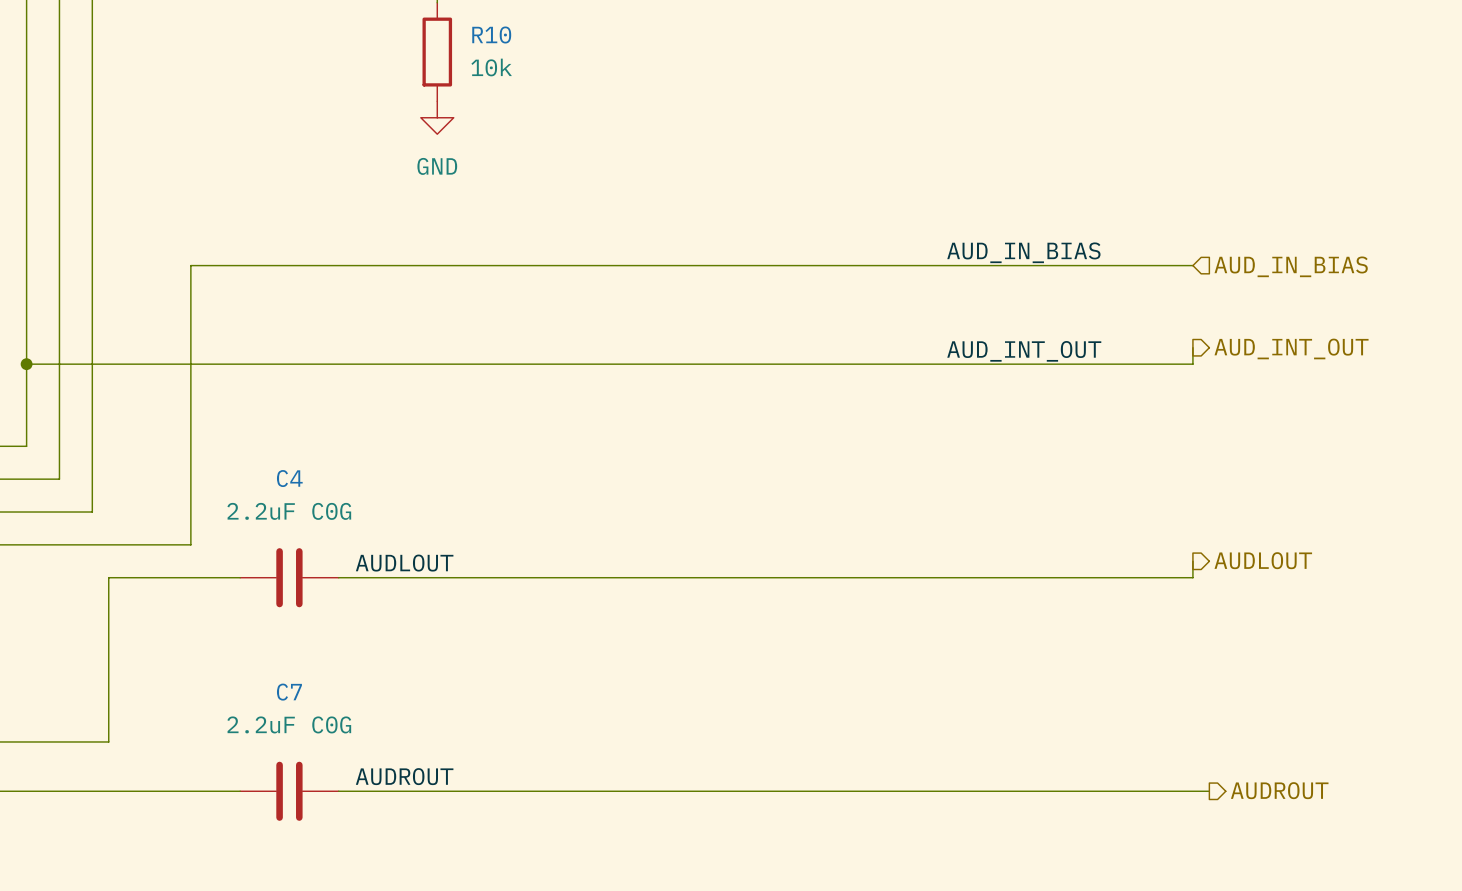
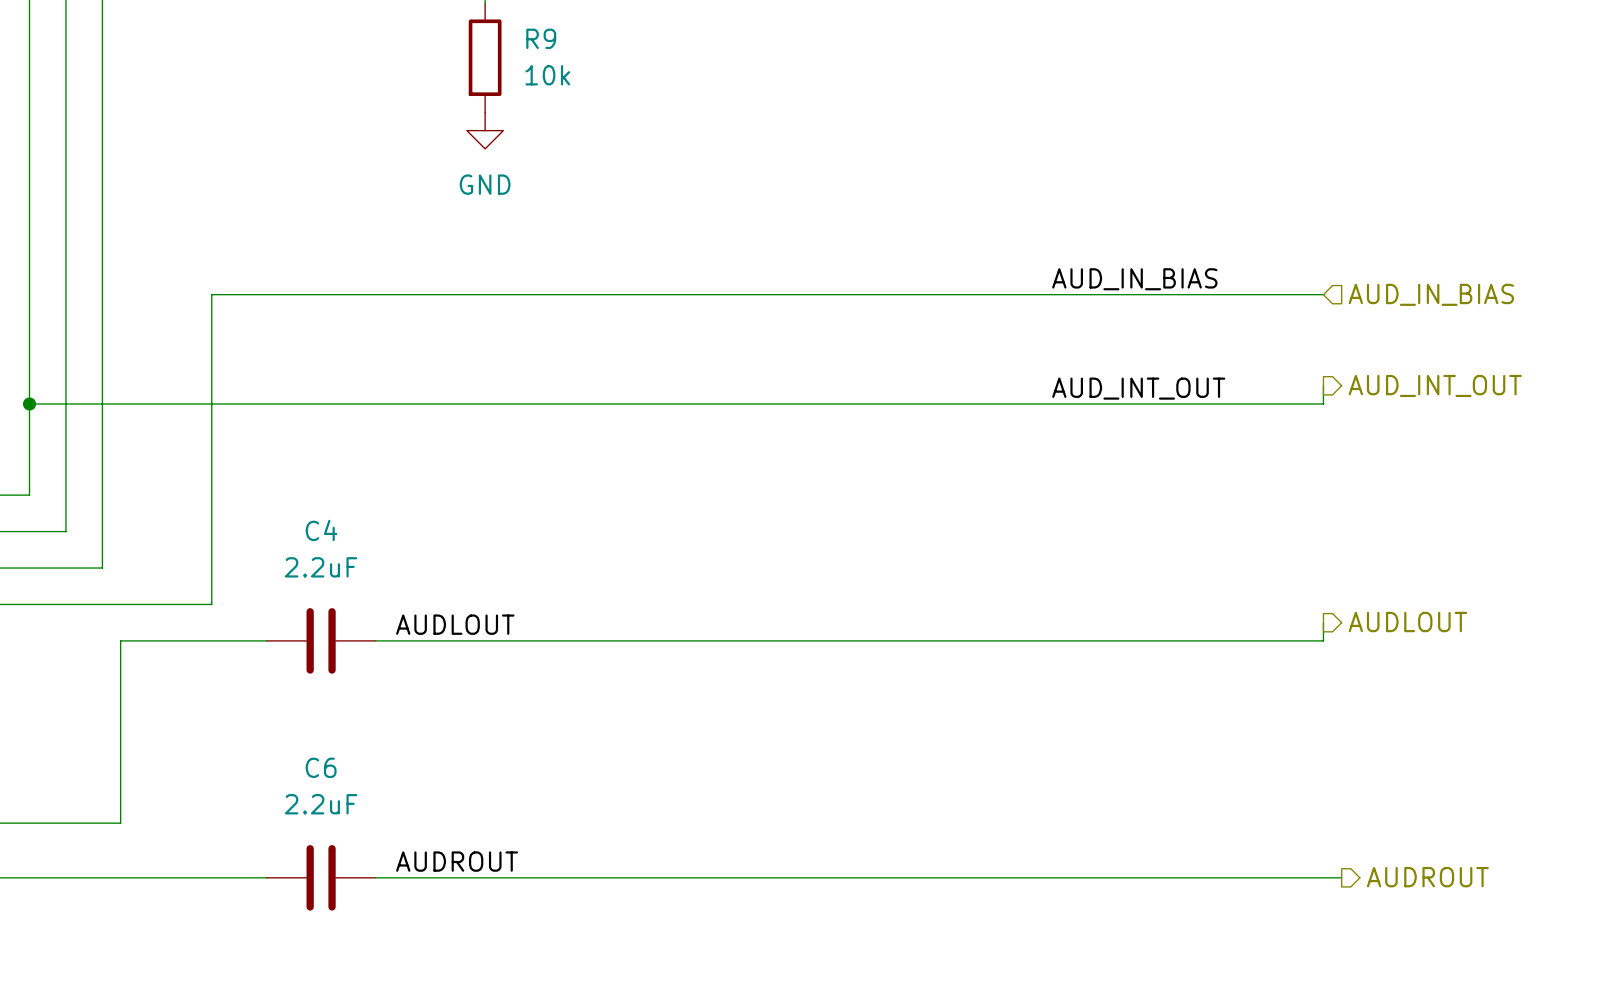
R10 name: R10 (491, 35) -> R9 (541, 38)
C4 value: 2.2uF C0G (289, 511) -> 2.2uF (321, 567)
C7 name: C7 (289, 692) -> C6 (321, 767)
C7 value: 2.2uF C0G (289, 724) -> 2.2uF (321, 804)

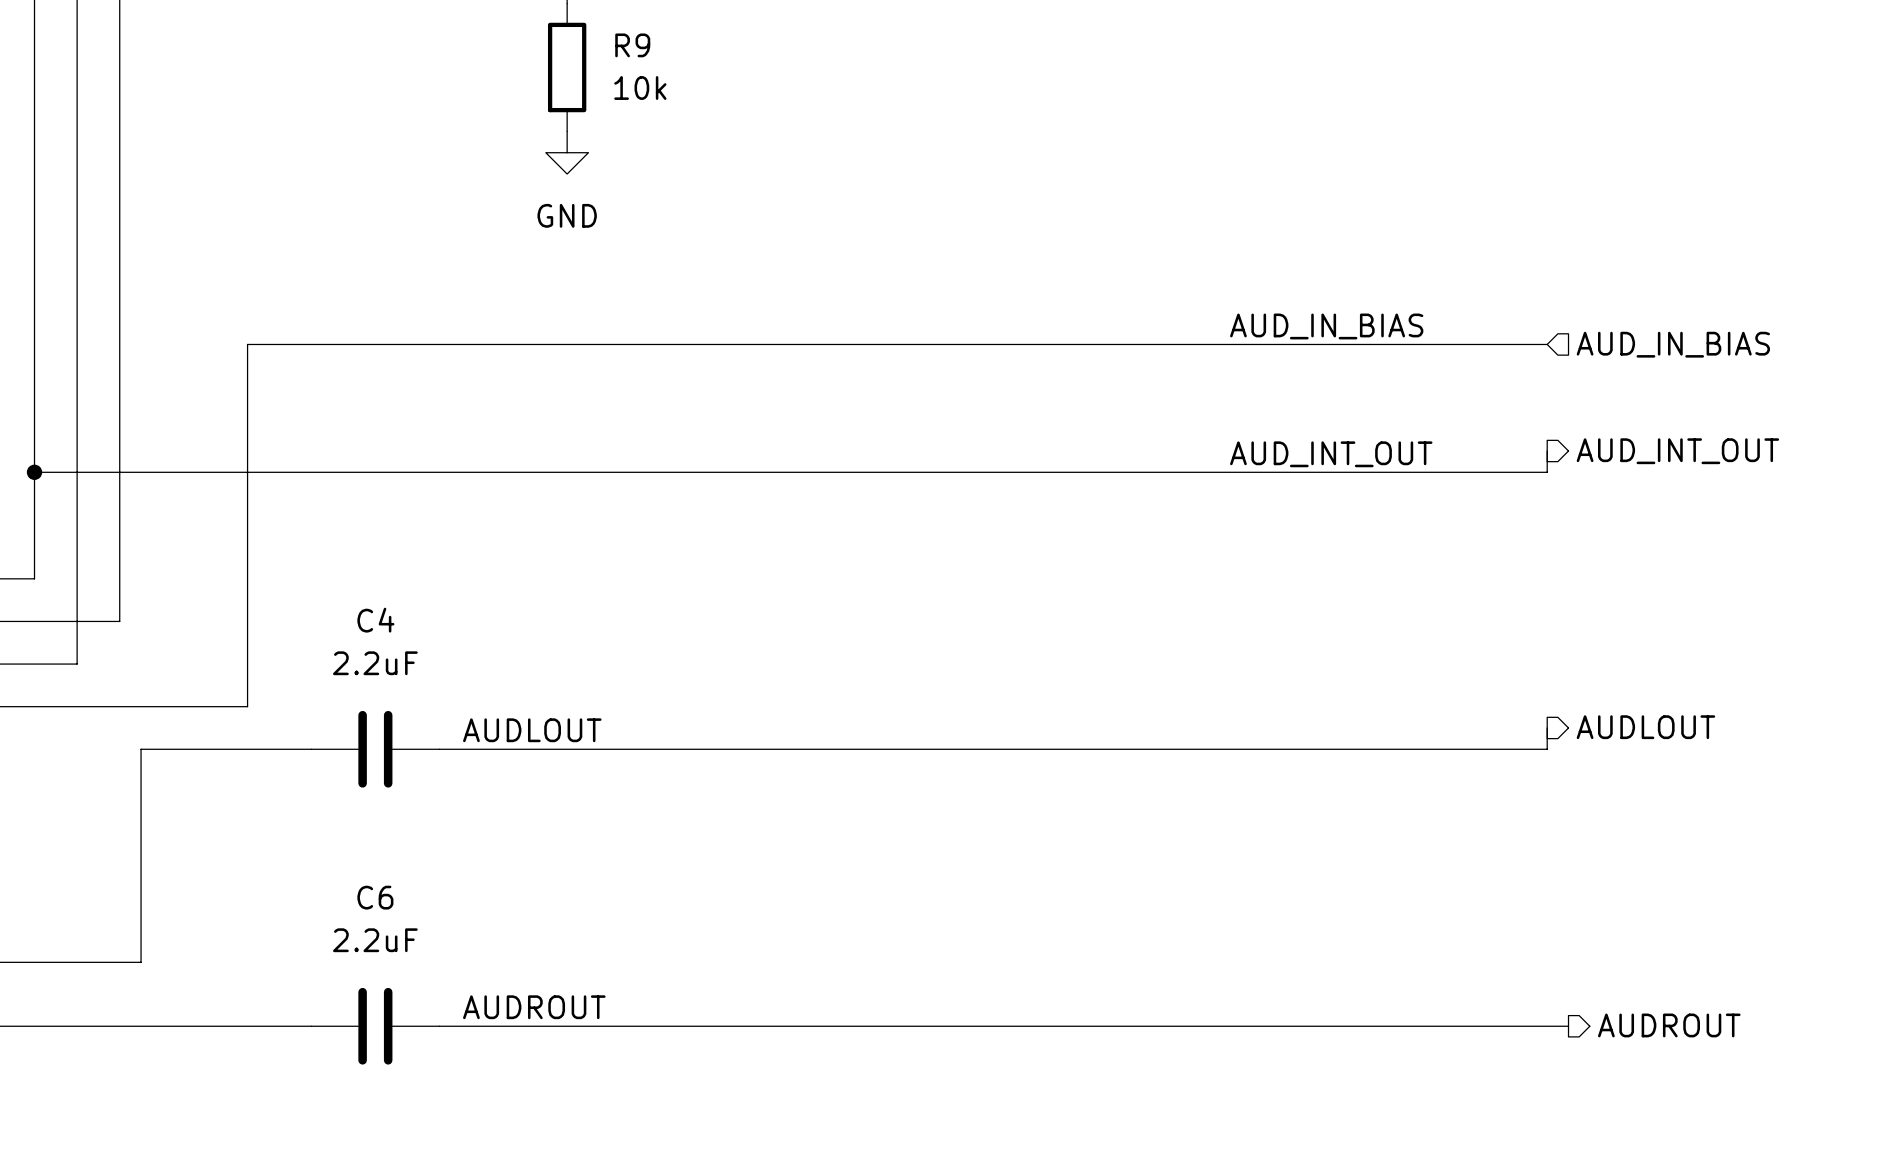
wire: (102, 531) (102, 568) (65, 568) -> (119, 621) (77, 621) (77, 664)

